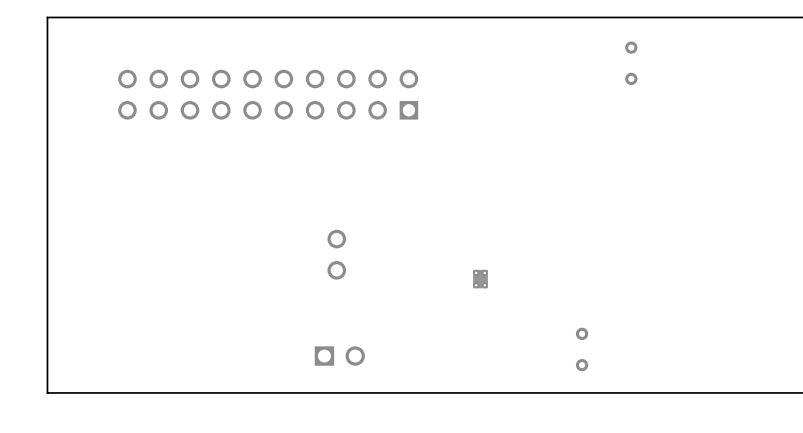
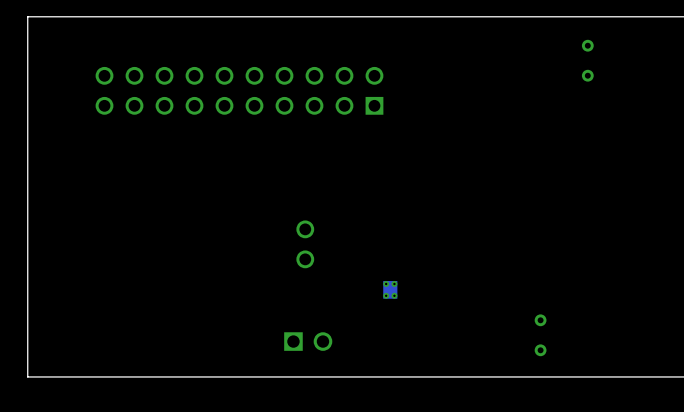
part position: (480, 279) -> (390, 289)

